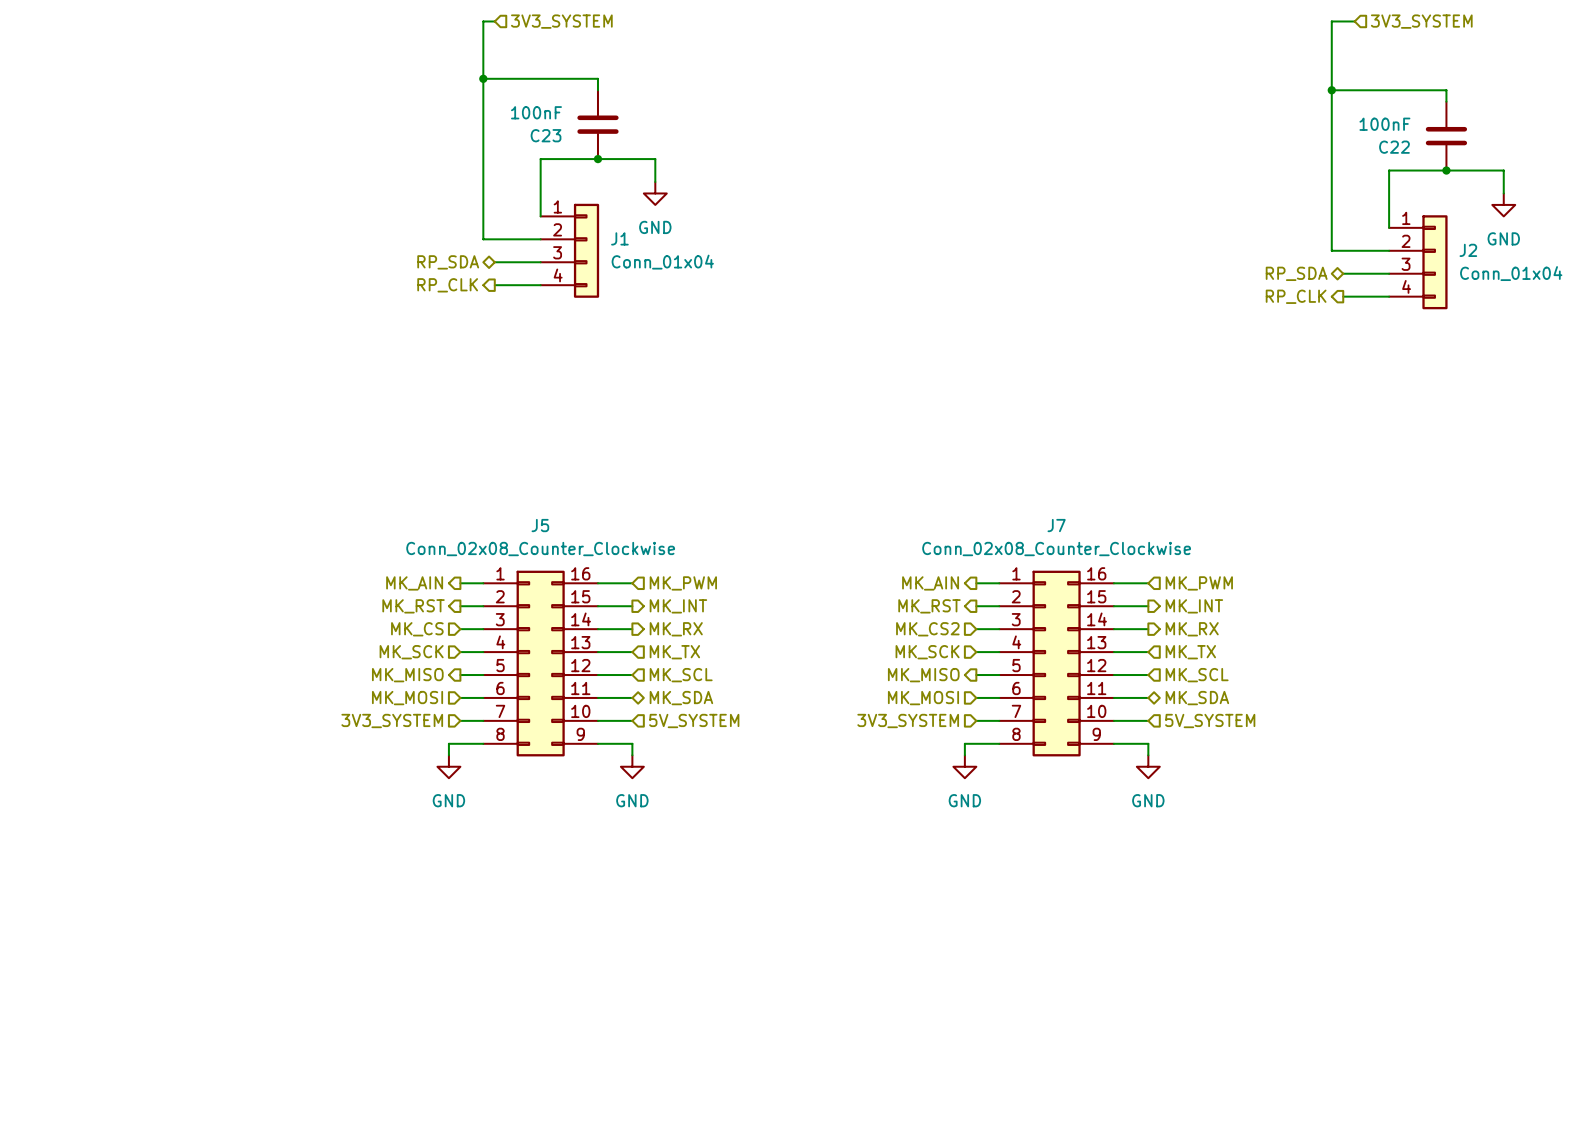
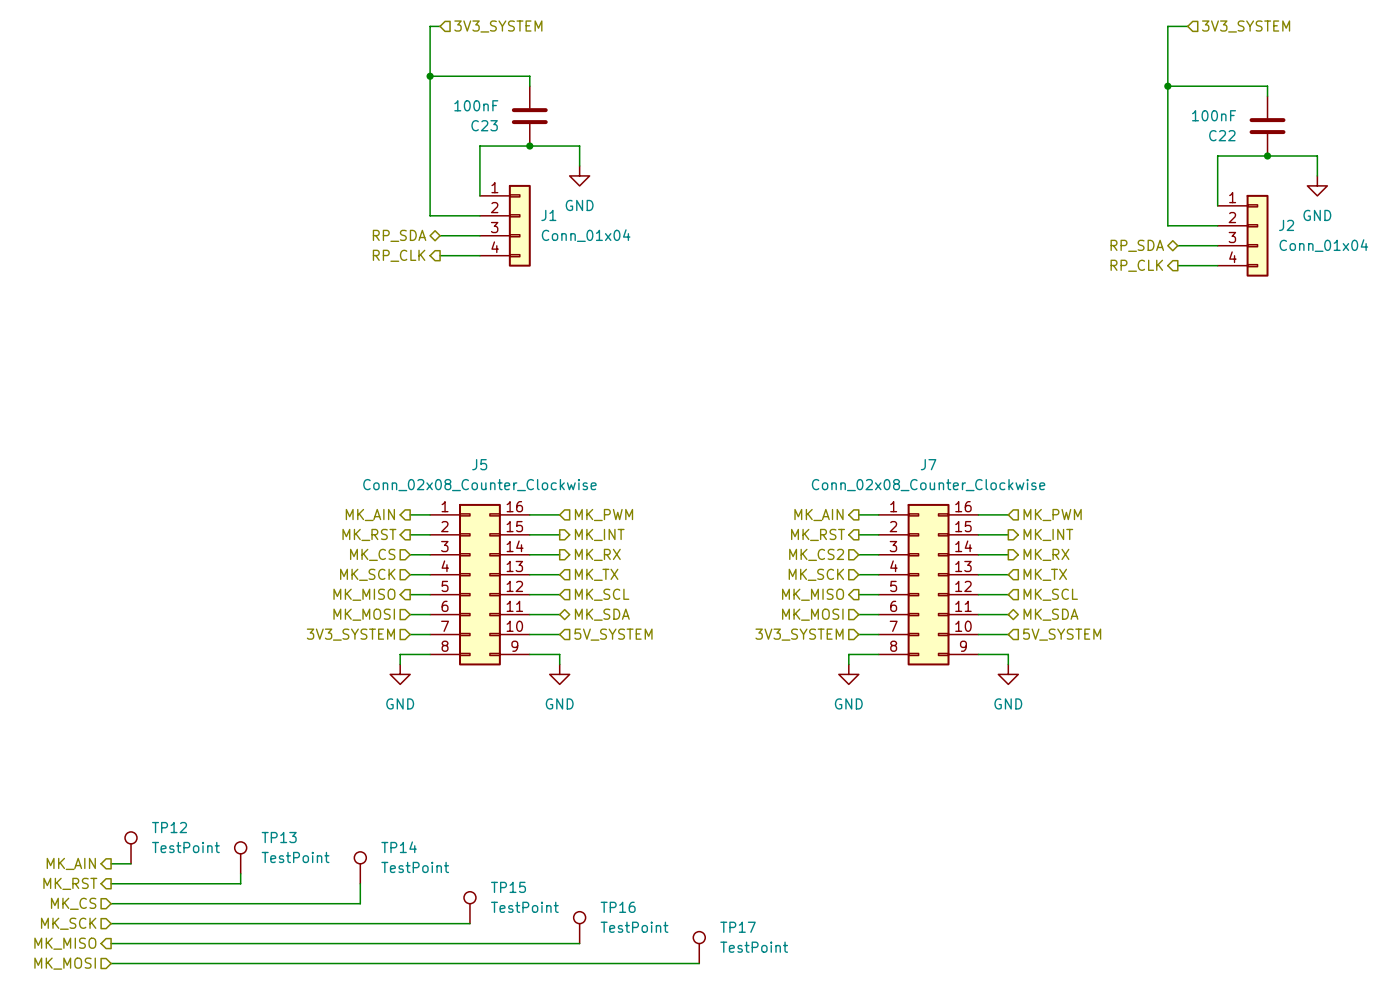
TP12: none -> TestPoint (131, 847)
TP13: none -> TestPoint (240, 857)
hierarchical label: none -> MK_AIN (71, 863)
wire: none -> (111, 863) (131, 863)
TP14: none -> TestPoint (360, 867)
wire: none -> (240, 873) (240, 883) (111, 883)
hierarchical label: none -> MK_RST (70, 883)
wire: none -> (360, 883) (360, 903) (111, 903)
hierarchical label: none -> MK_CS (73, 903)
TP15: none -> TestPoint (469, 907)
hierarchical label: none -> MK_SCK (68, 923)
wire: none -> (111, 923) (469, 923)
TP16: none -> TestPoint (579, 927)
hierarchical label: none -> MK_MISO (65, 943)
wire: none -> (111, 943) (579, 943)
TP17: none -> TestPoint (699, 947)
hierarchical label: none -> MK_MOSI (65, 963)
wire: none -> (111, 963) (699, 963)

